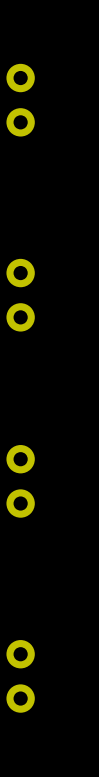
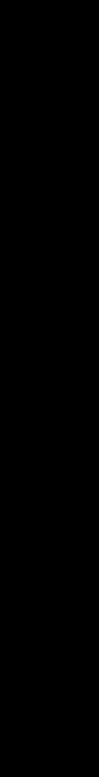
part: (20, 100) -> none
part: (20, 295) -> none
part: (20, 481) -> none
part: (20, 676) -> none

